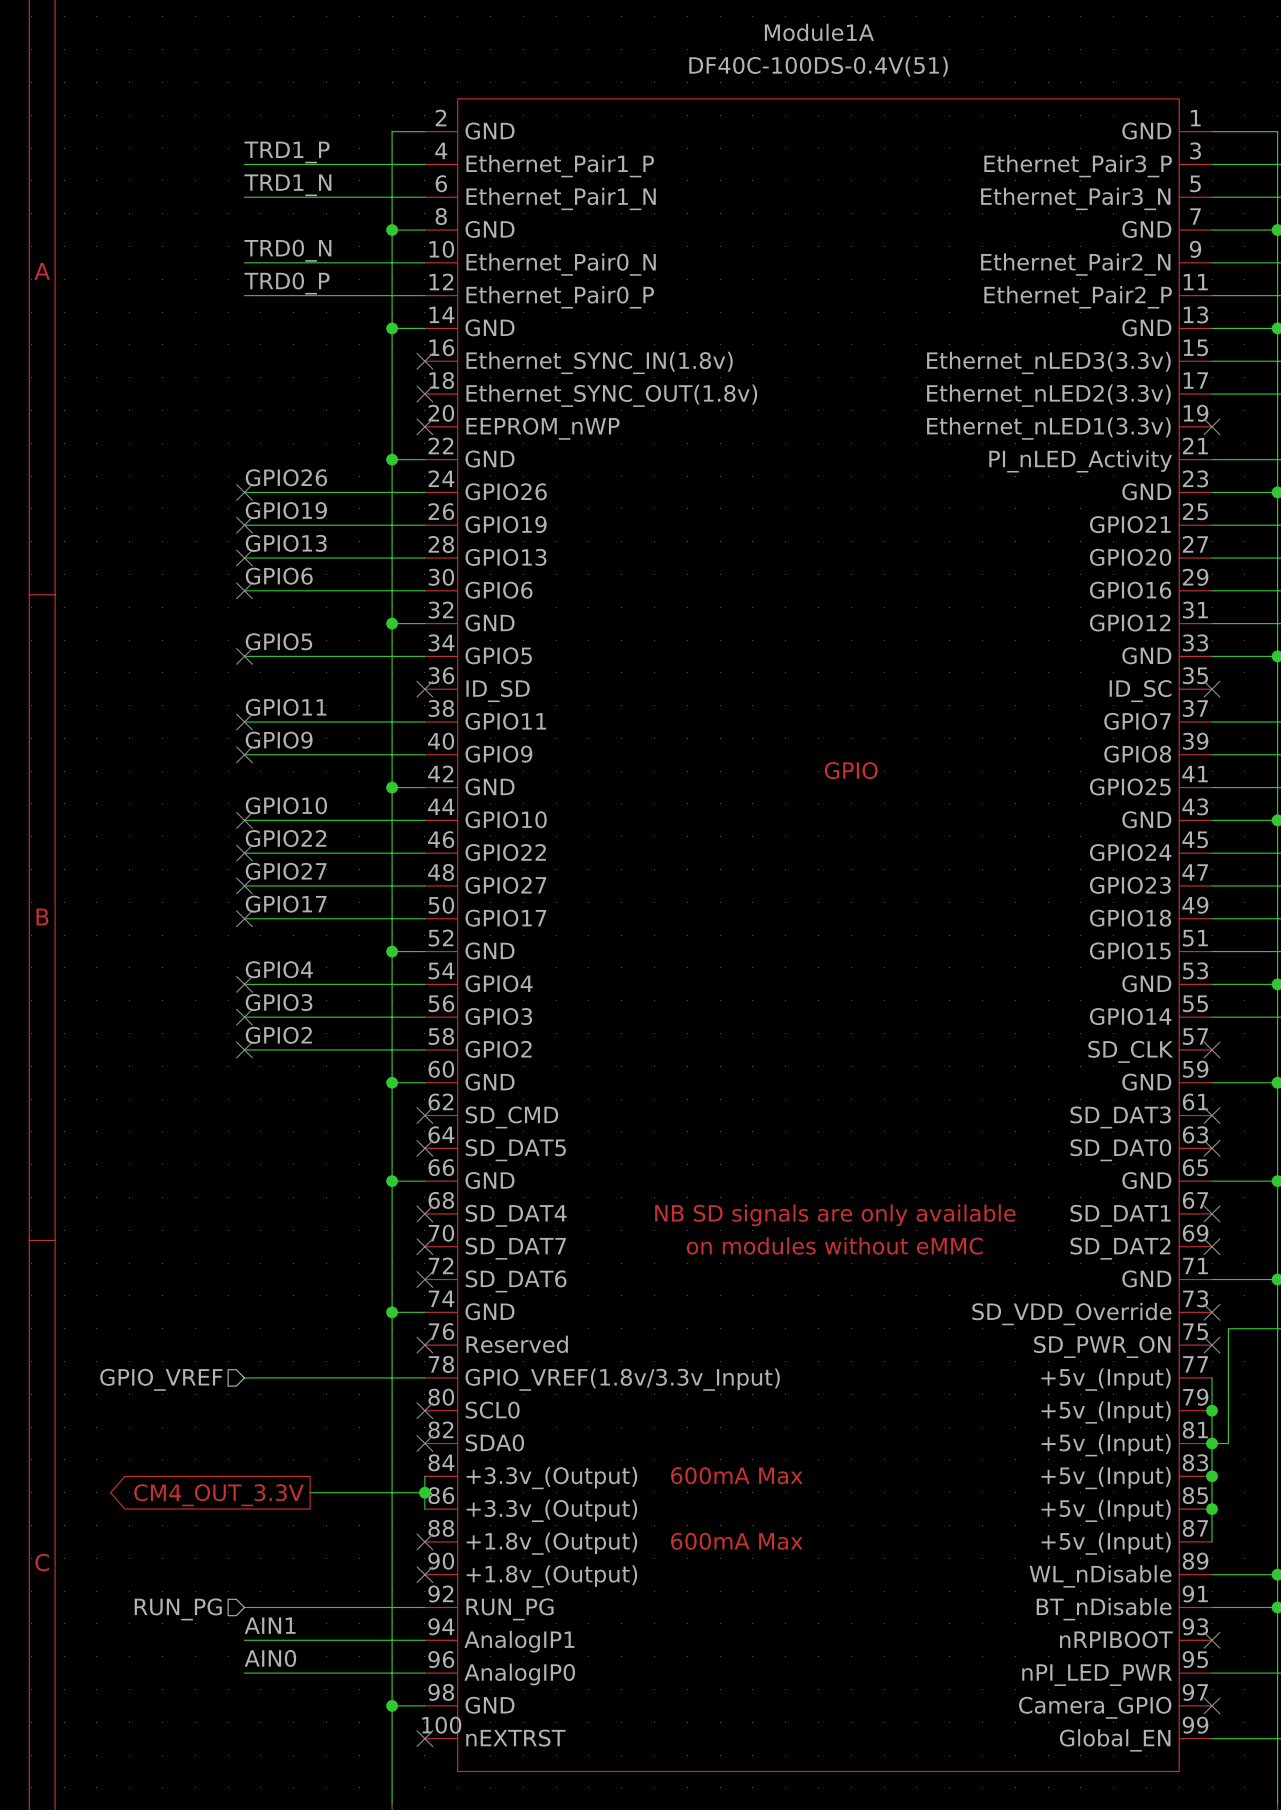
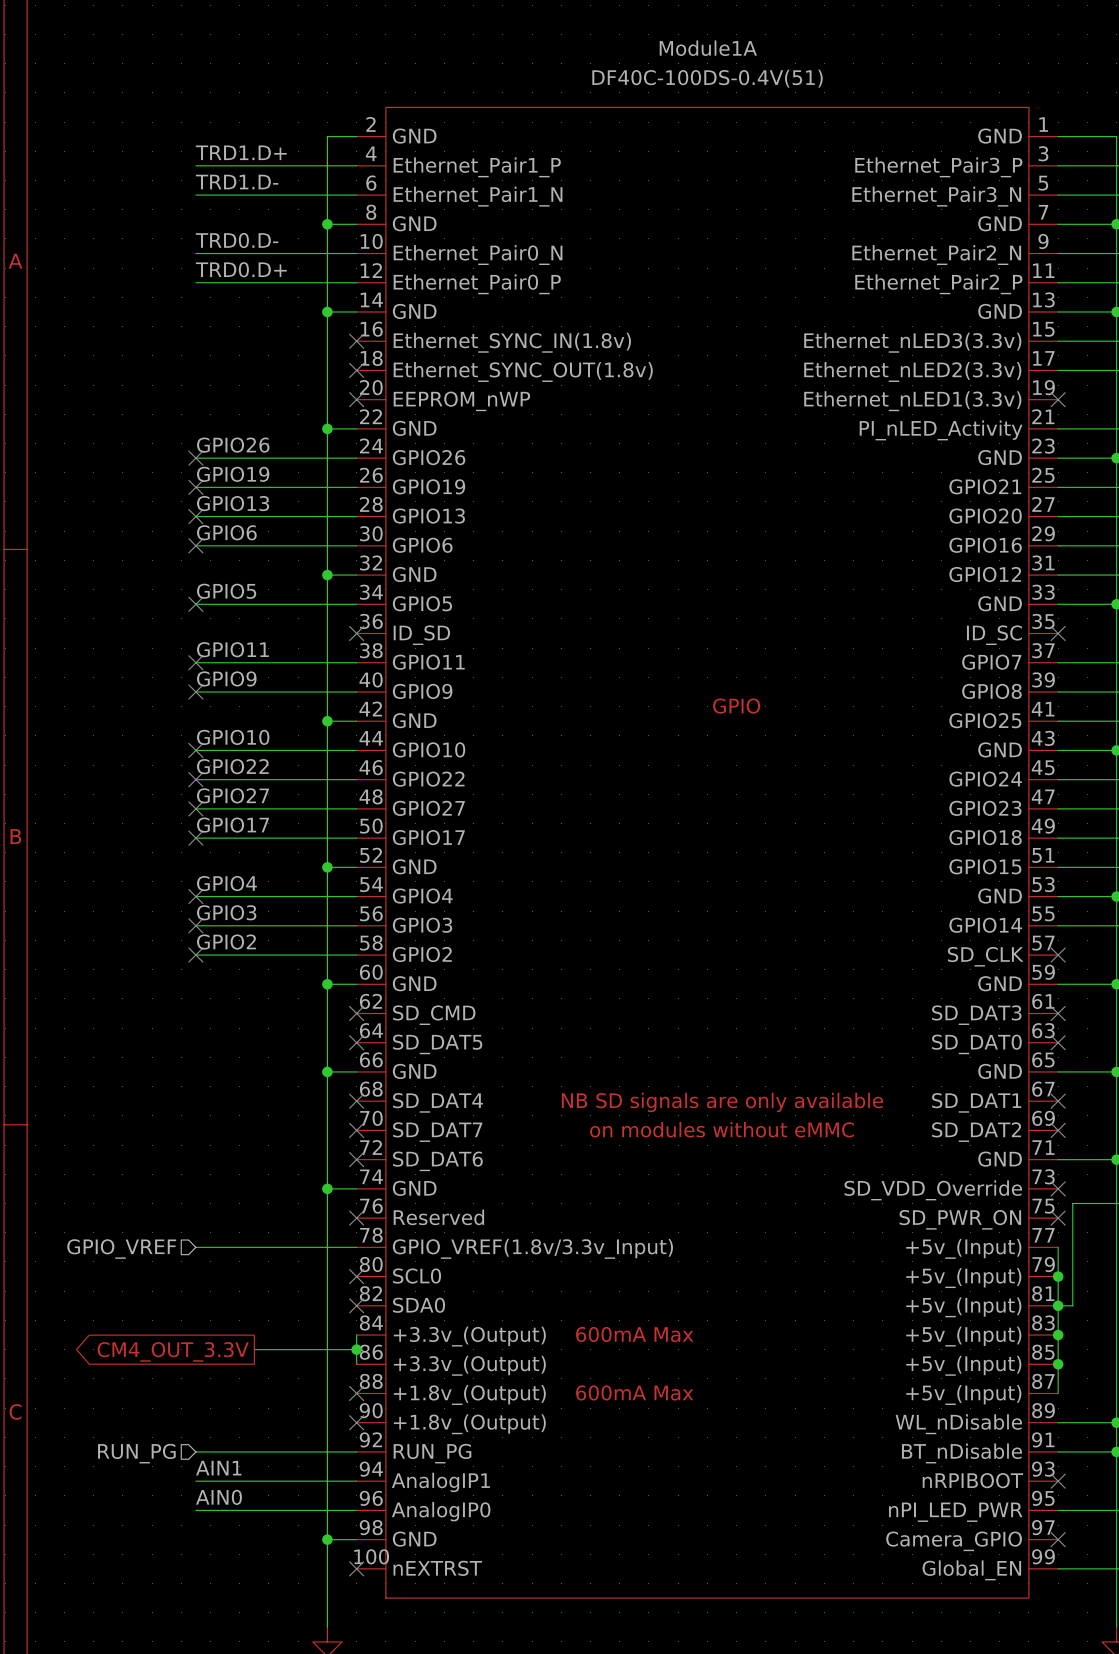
label: TRD1_P (286, 152) -> TRD1.D+ (241, 152)
label: TRD1_N (287, 185) -> TRD1.D- (237, 182)
label: TRD0_N (287, 250) -> TRD0.D- (237, 240)
label: TRD0_P (286, 283) -> TRD0.D+ (241, 269)

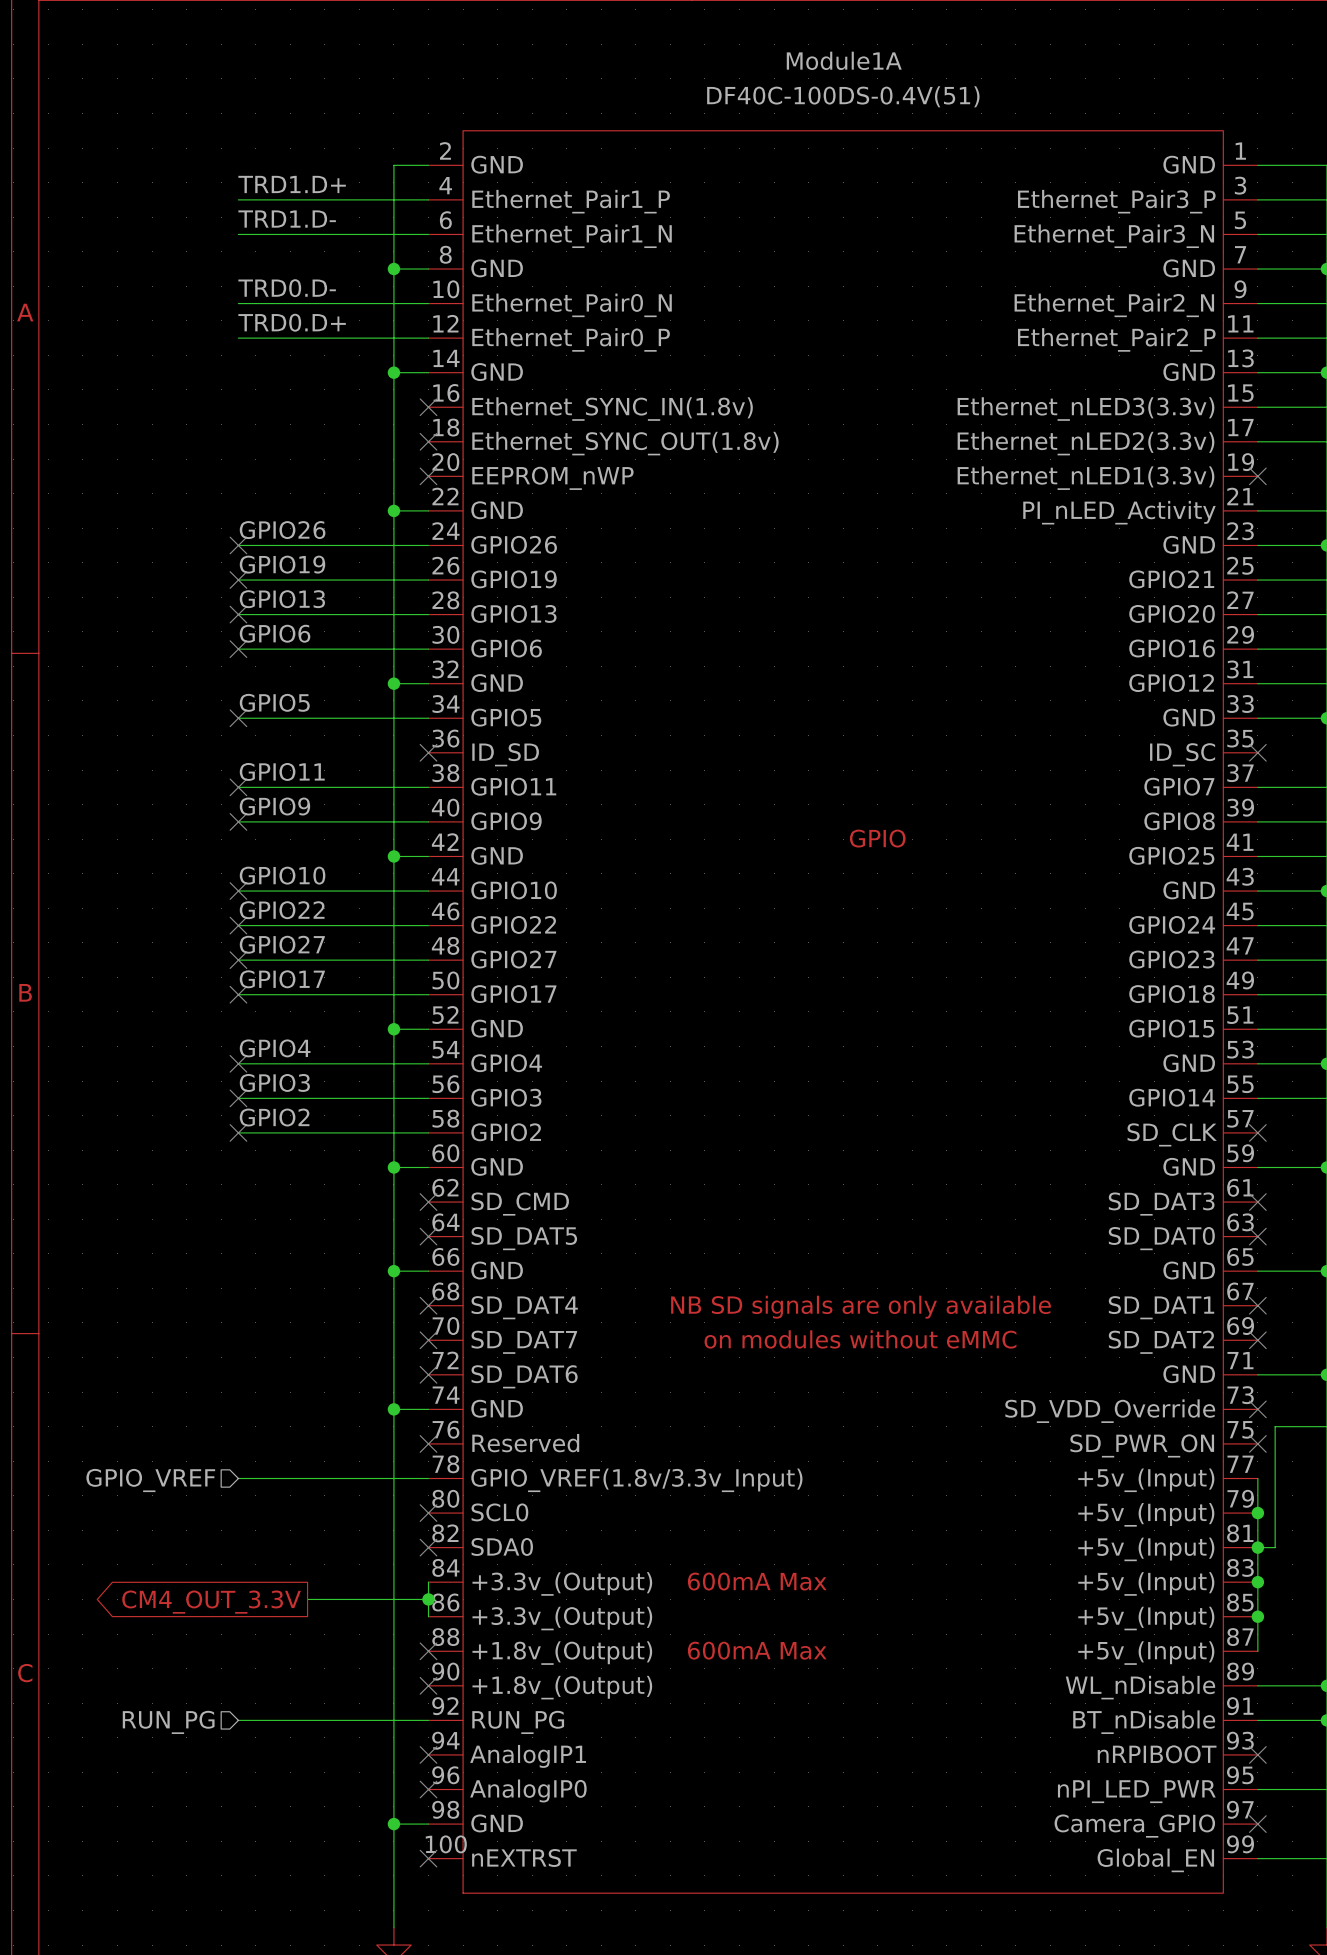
label: AIN1 (218, 1468) -> none
wire: (195, 1481) (356, 1481) -> none
no-connect mark: none -> (428, 1754)
label: AIN0 (218, 1497) -> none
wire: (195, 1510) (356, 1510) -> none
no-connect mark: none -> (428, 1789)

